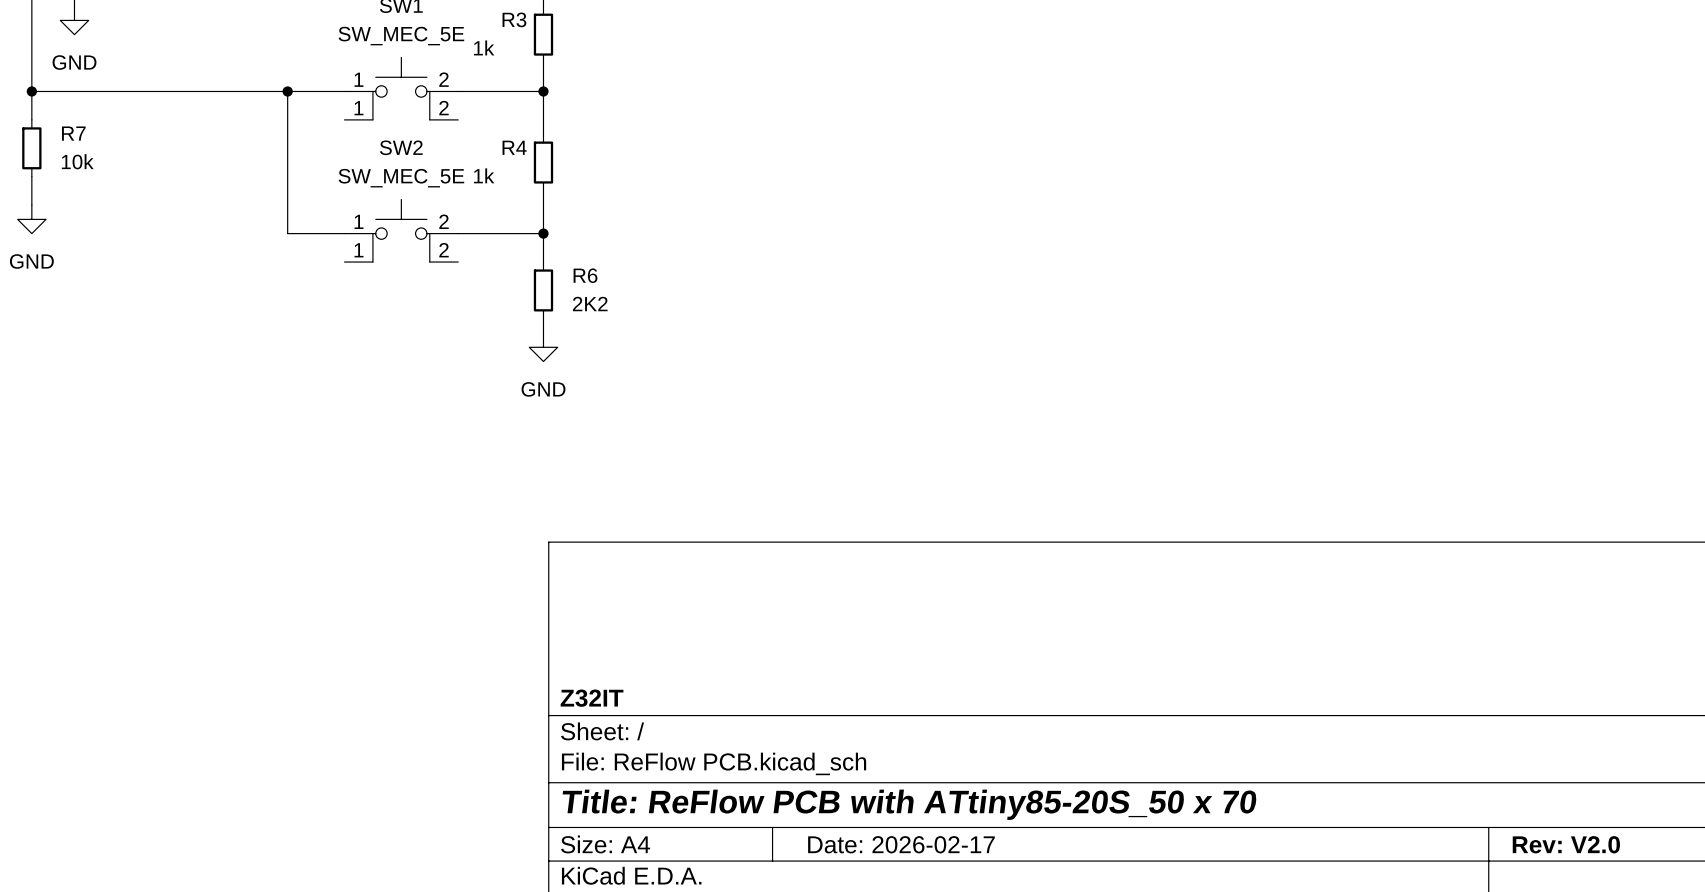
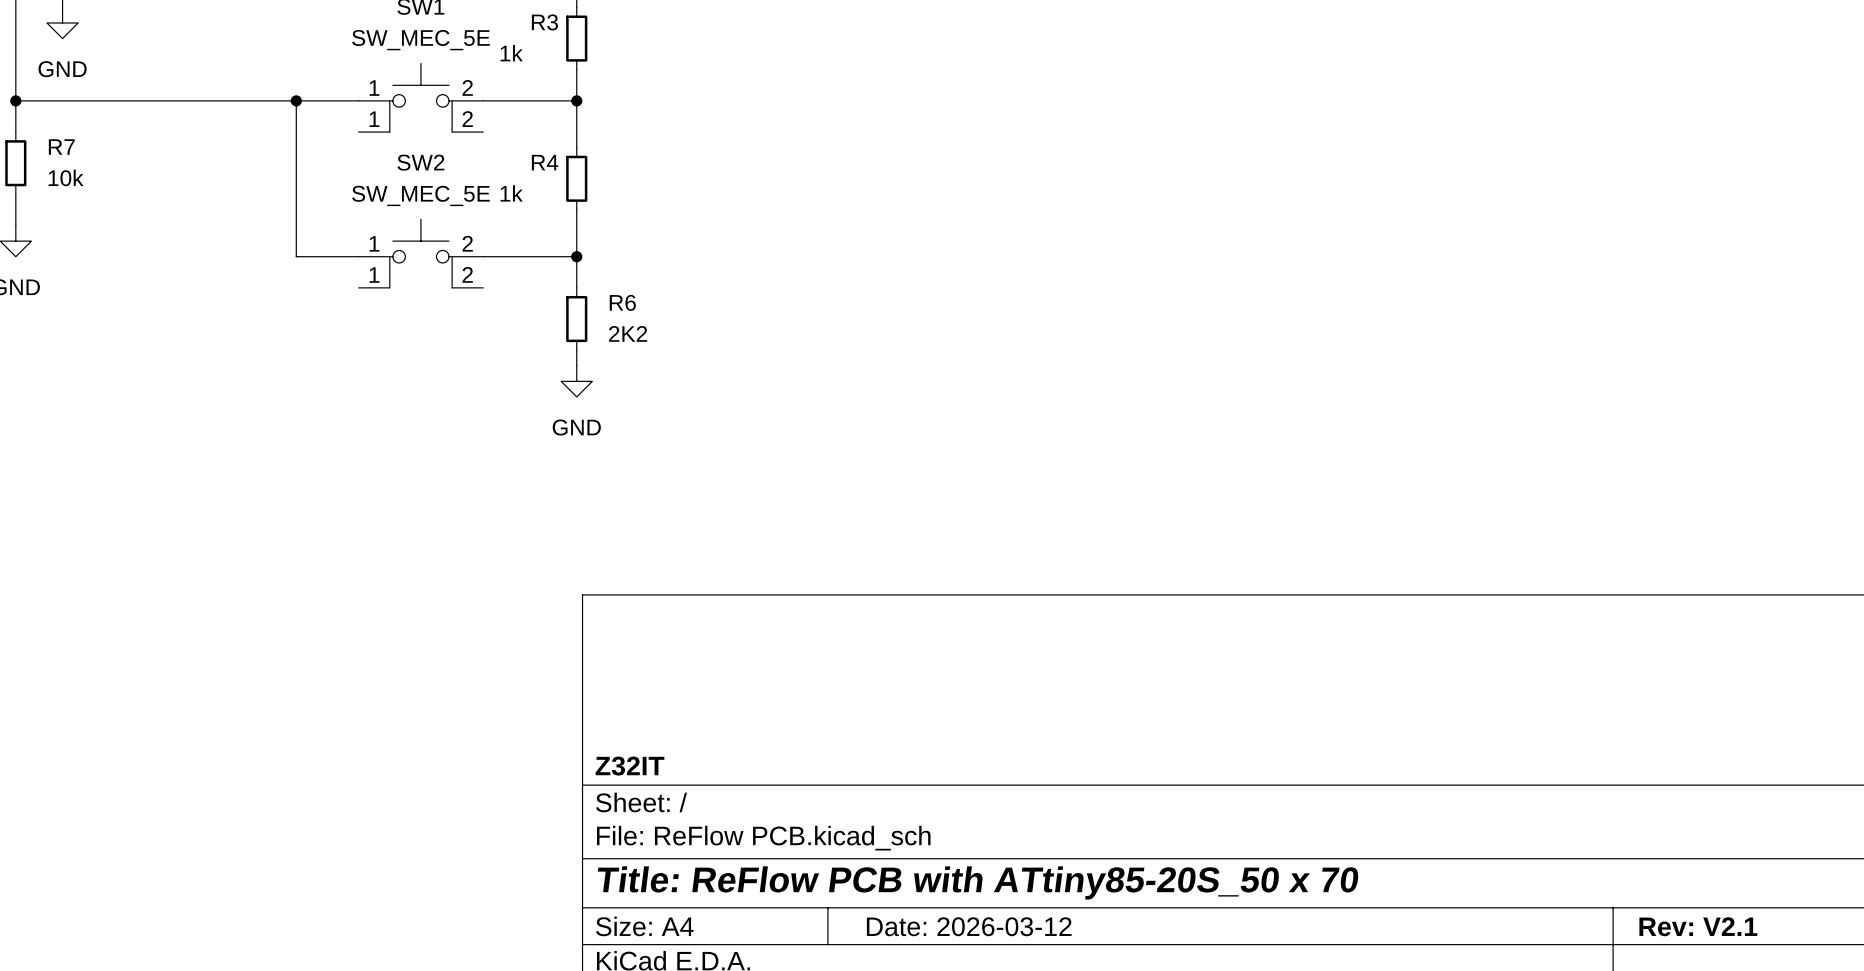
title block: Date: 2026-02-17 (901, 844) -> Date: 2026-03-12 (969, 926)
title block: Rev: V2.0 (1566, 844) -> Rev: V2.1 (1698, 926)

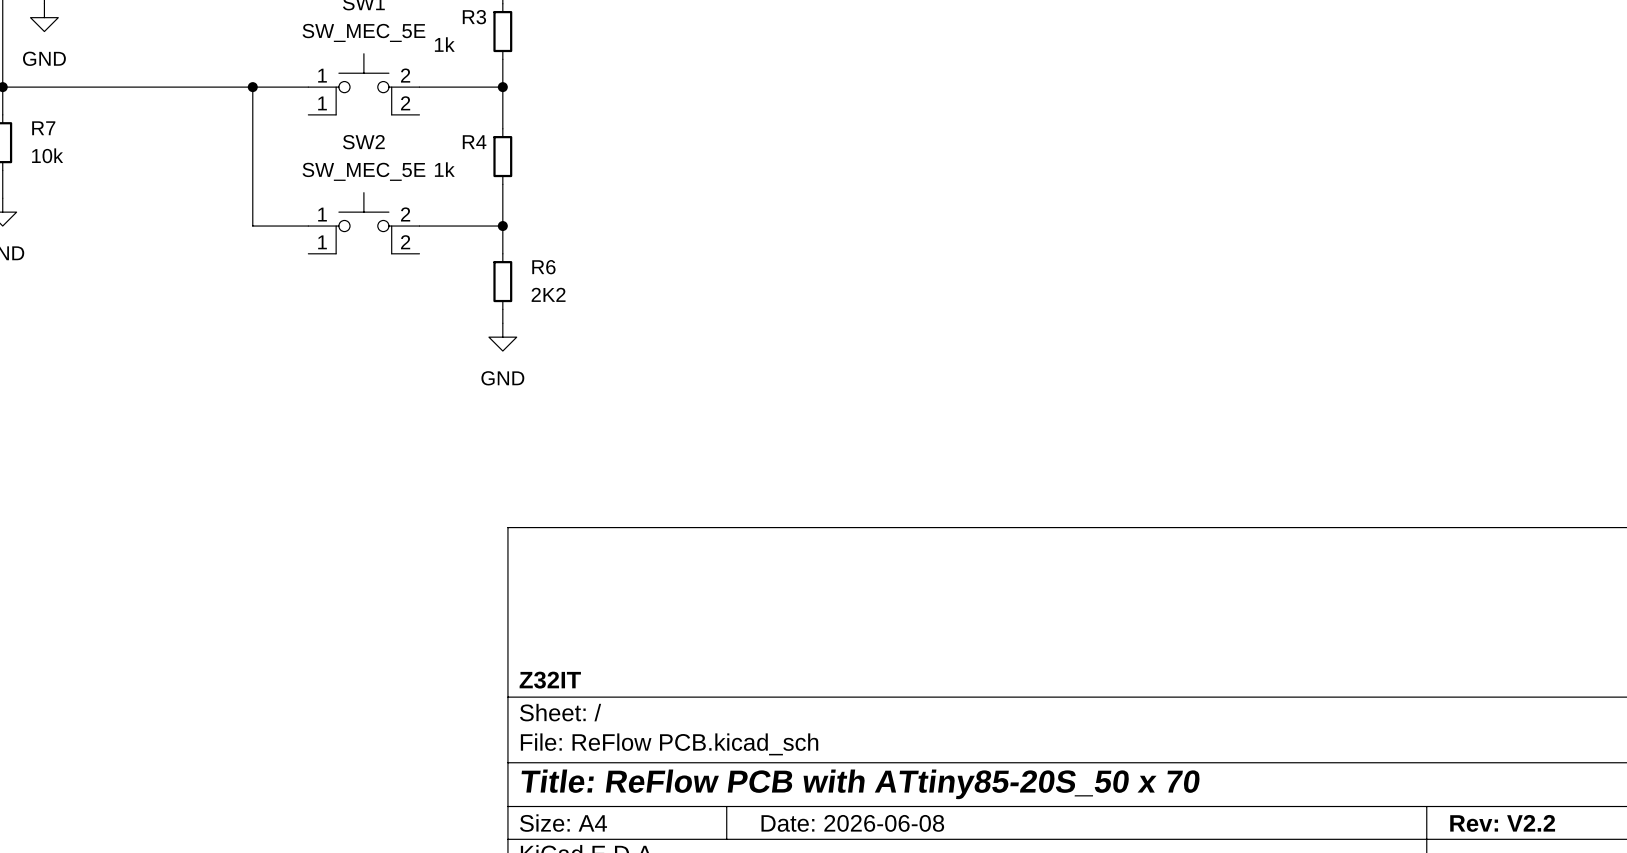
title block: Date: 2026-03-12 (969, 926) -> Date: 2026-06-08 (852, 823)
title block: Rev: V2.1 (1698, 926) -> Rev: V2.2 (1502, 823)

